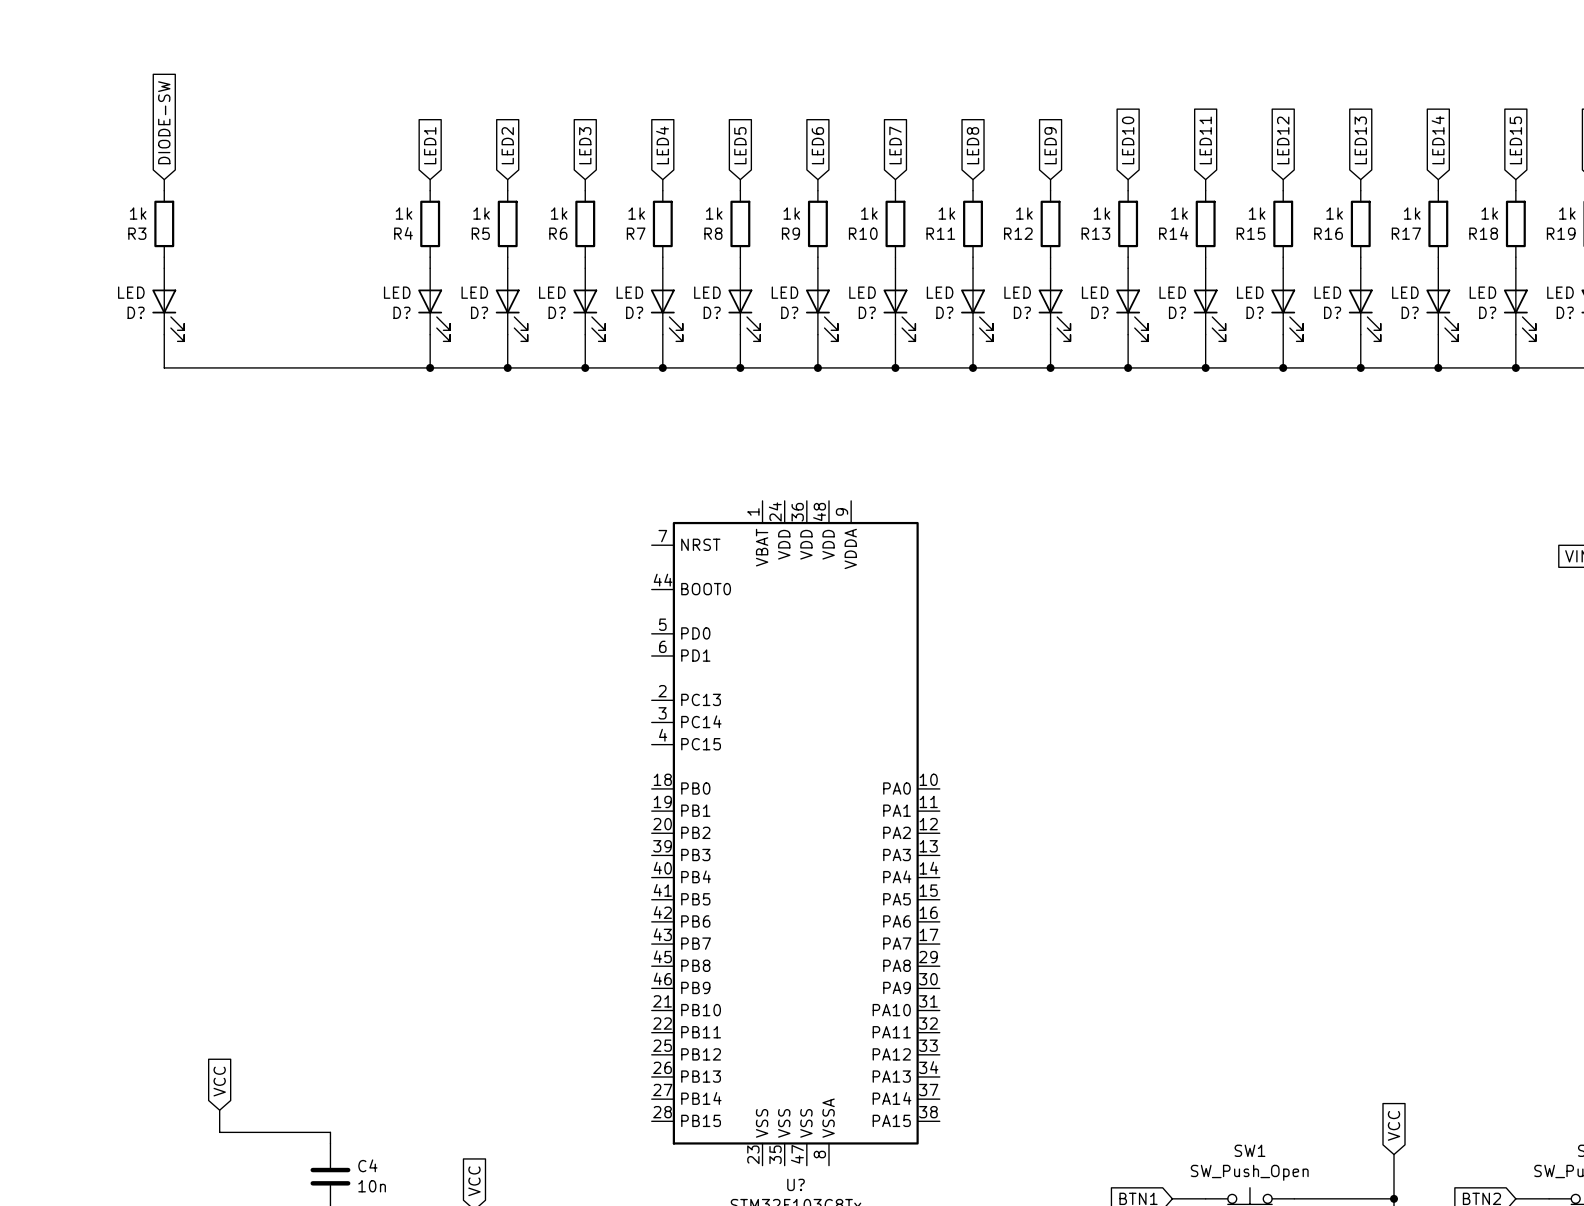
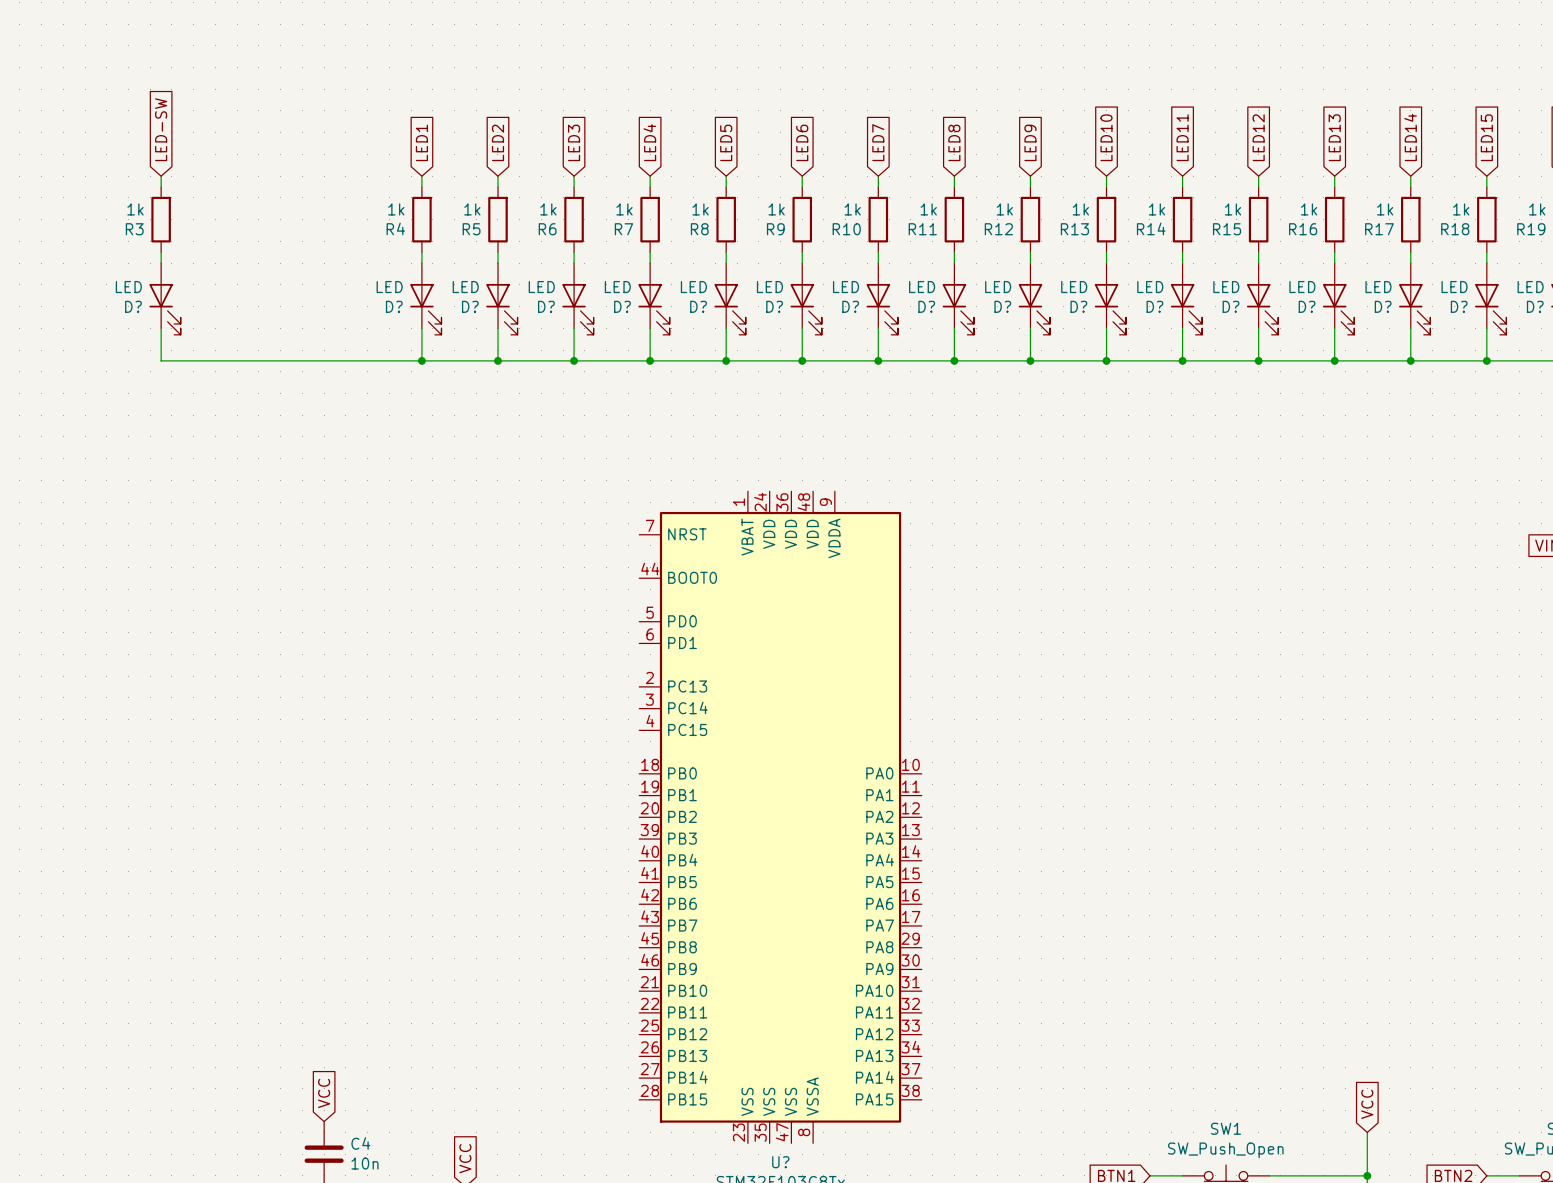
global label: DIODE-SW (164, 122) -> LED-SW (161, 129)
global label position: VCC (219, 1081) -> VCC (324, 1093)
wire: (219, 1110) (219, 1132) (330, 1132) (330, 1143) -> none

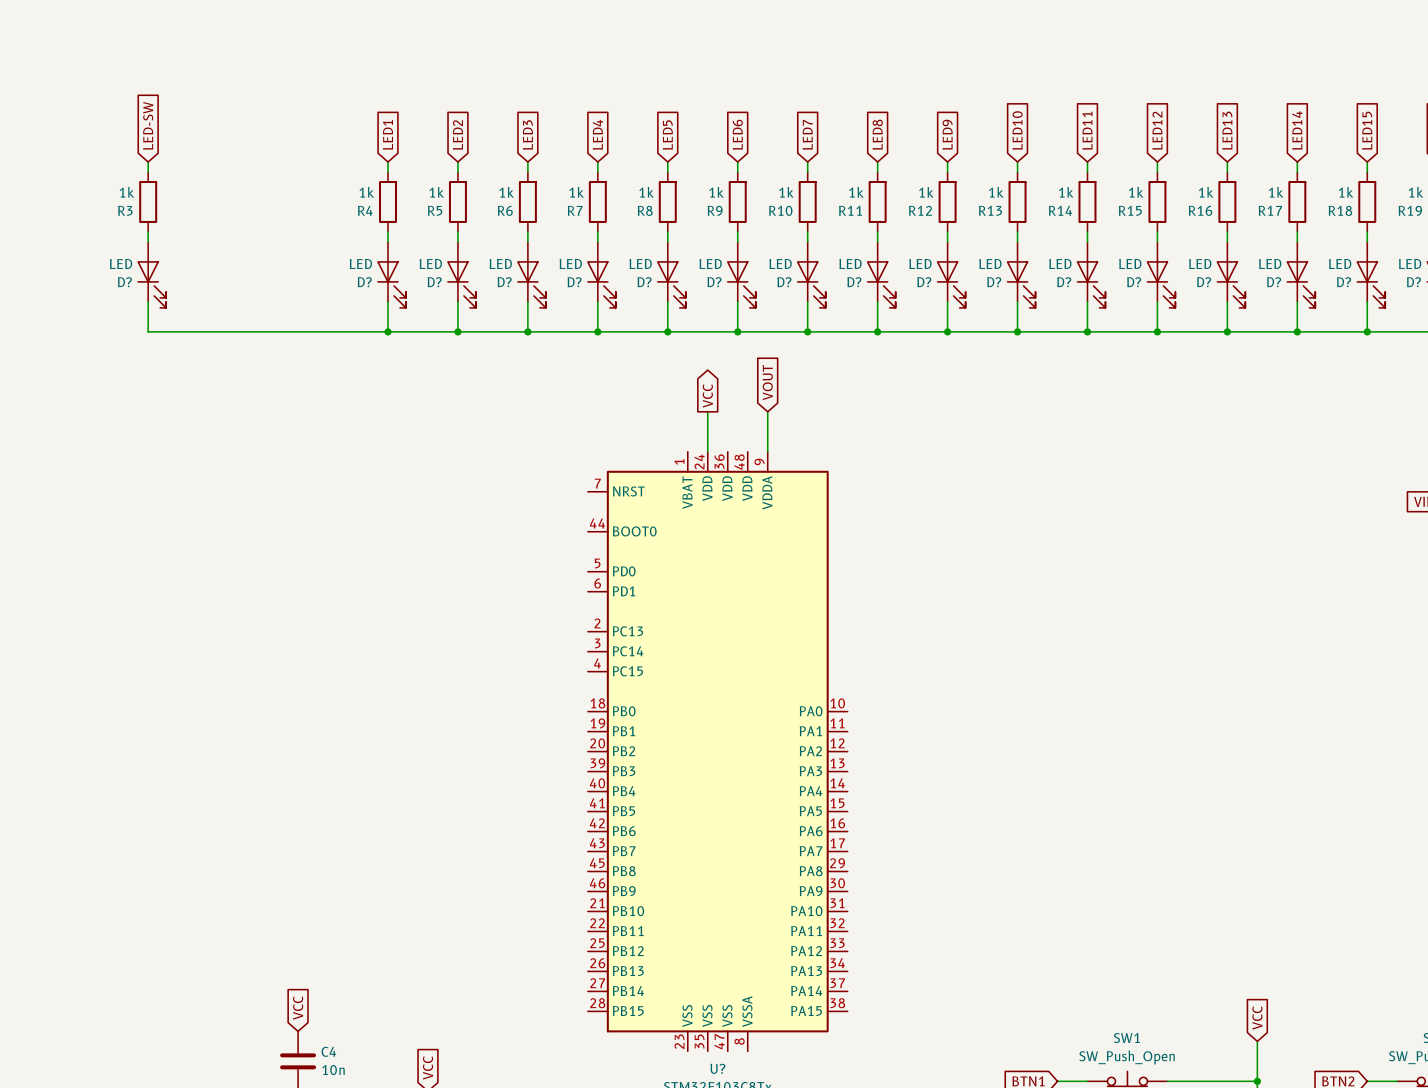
global label: none -> VOUT (767, 382)
global label: none -> VCC (707, 395)
wire: none -> (707, 411) (707, 451)
wire: none -> (767, 411) (767, 451)

